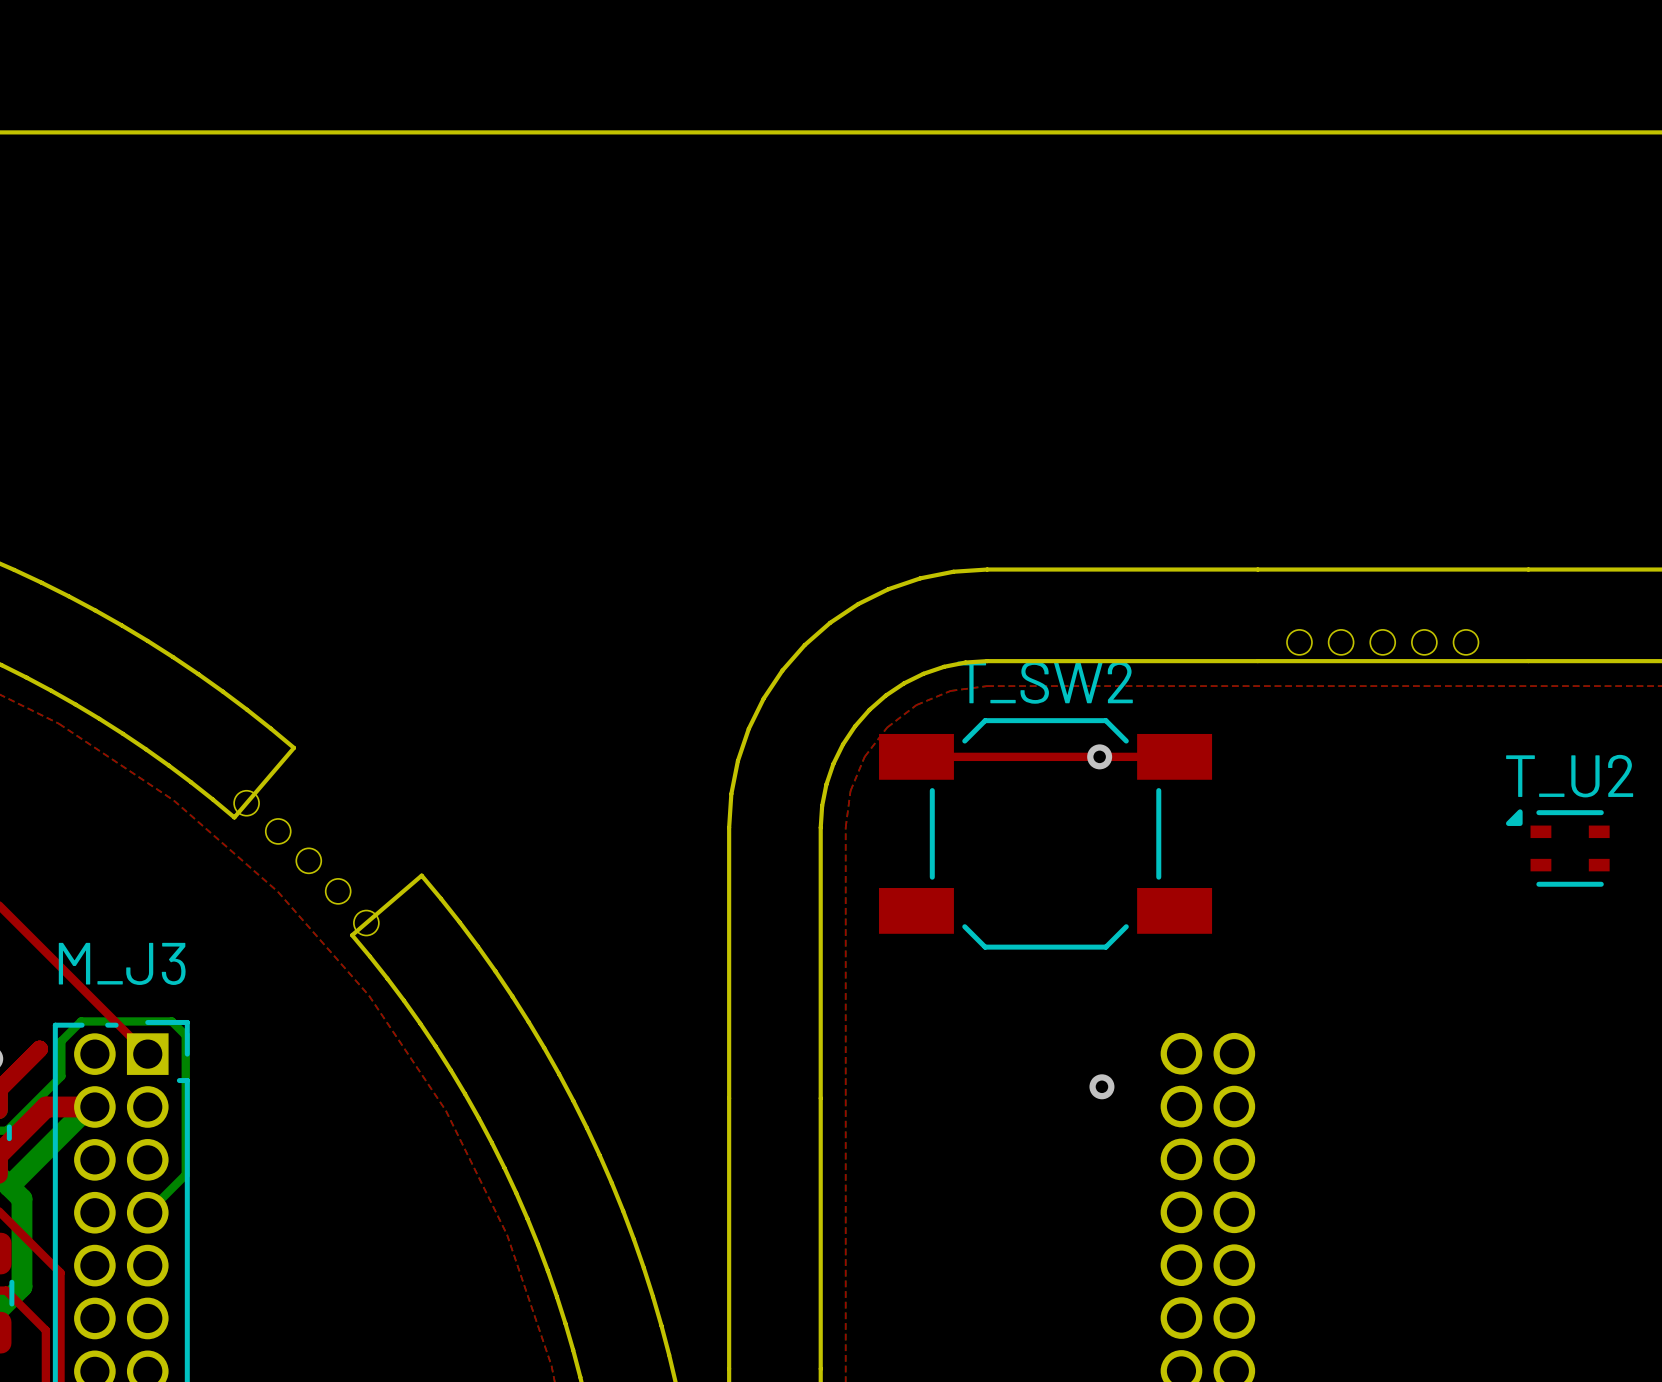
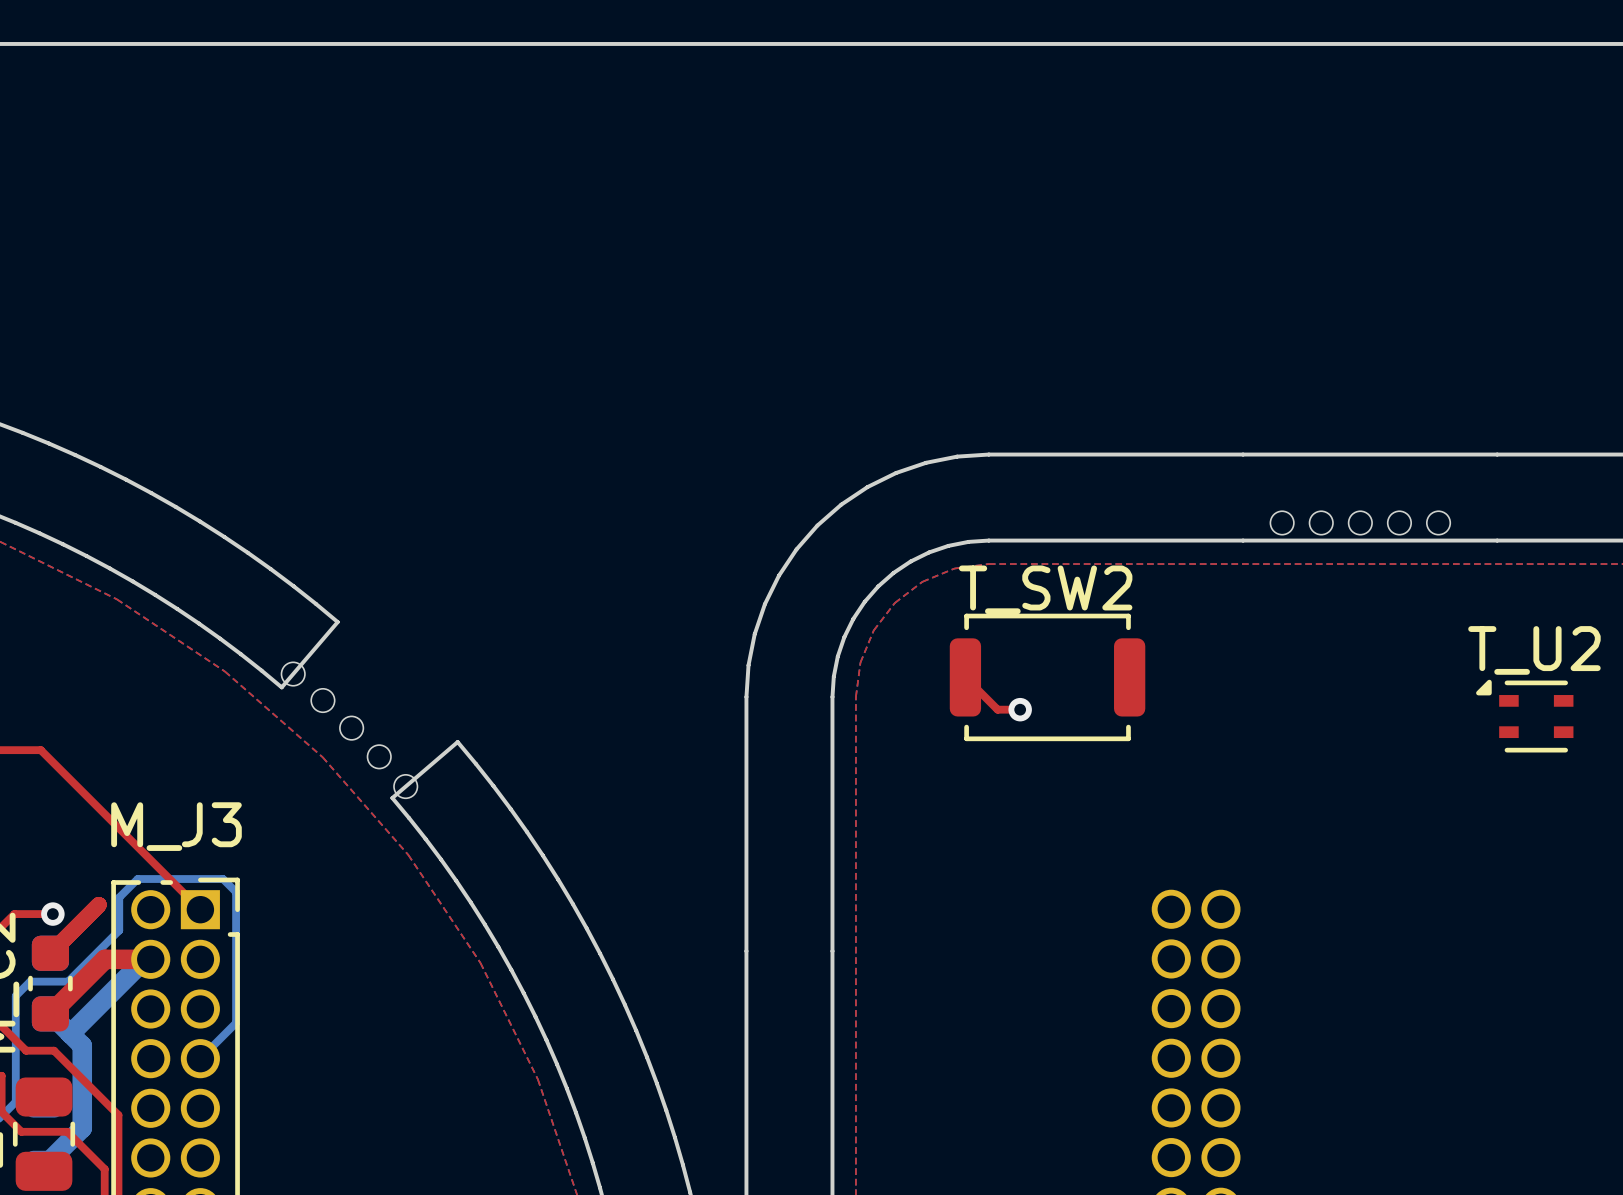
T_SW2 footprint: [879, 718, 1213, 950] -> [949, 613, 1146, 742]
top track: (916, 756) (1174, 756) -> none
via position: (1099, 756) -> (1020, 709)
top track: none -> (965, 677) (997, 709) (1020, 709)
via: (1101, 1086) -> none

